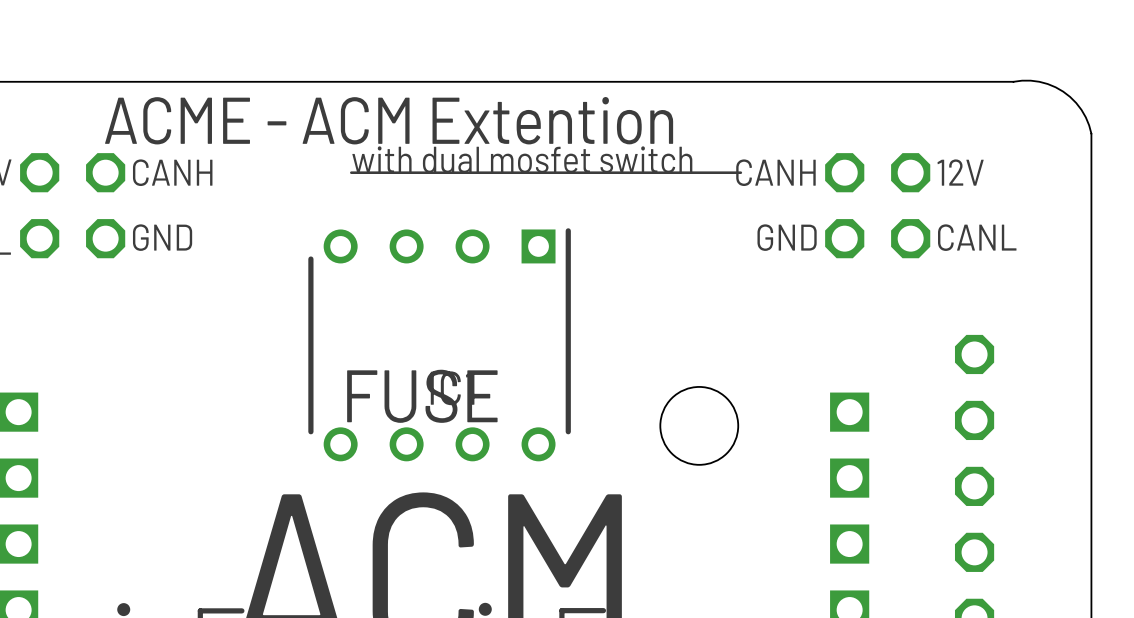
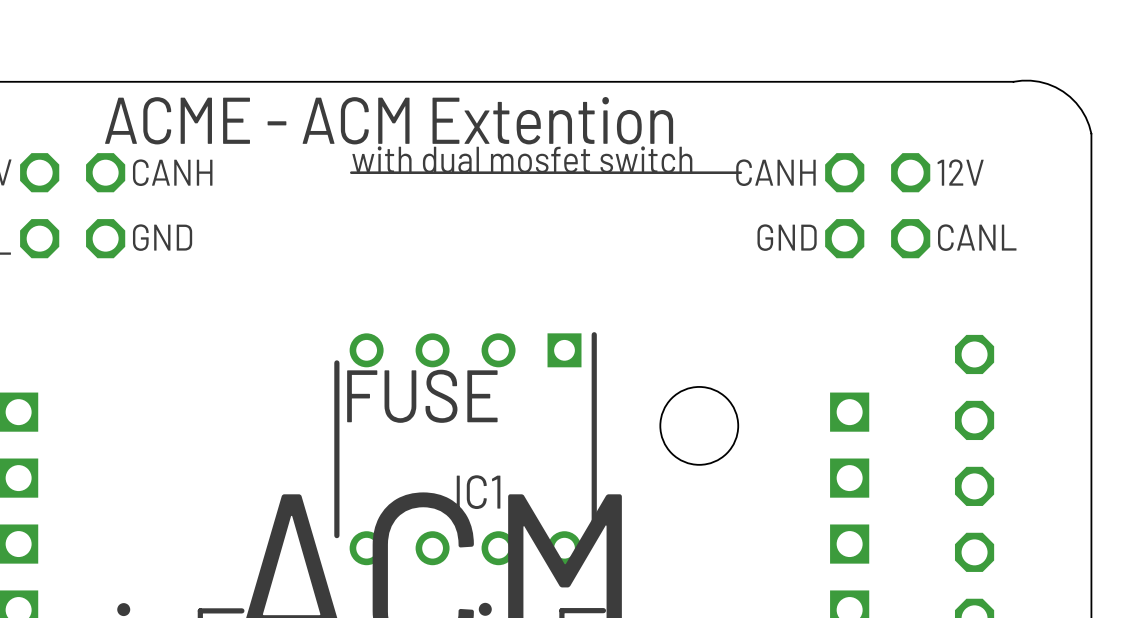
IC1 position: (439, 344) -> (465, 448)

